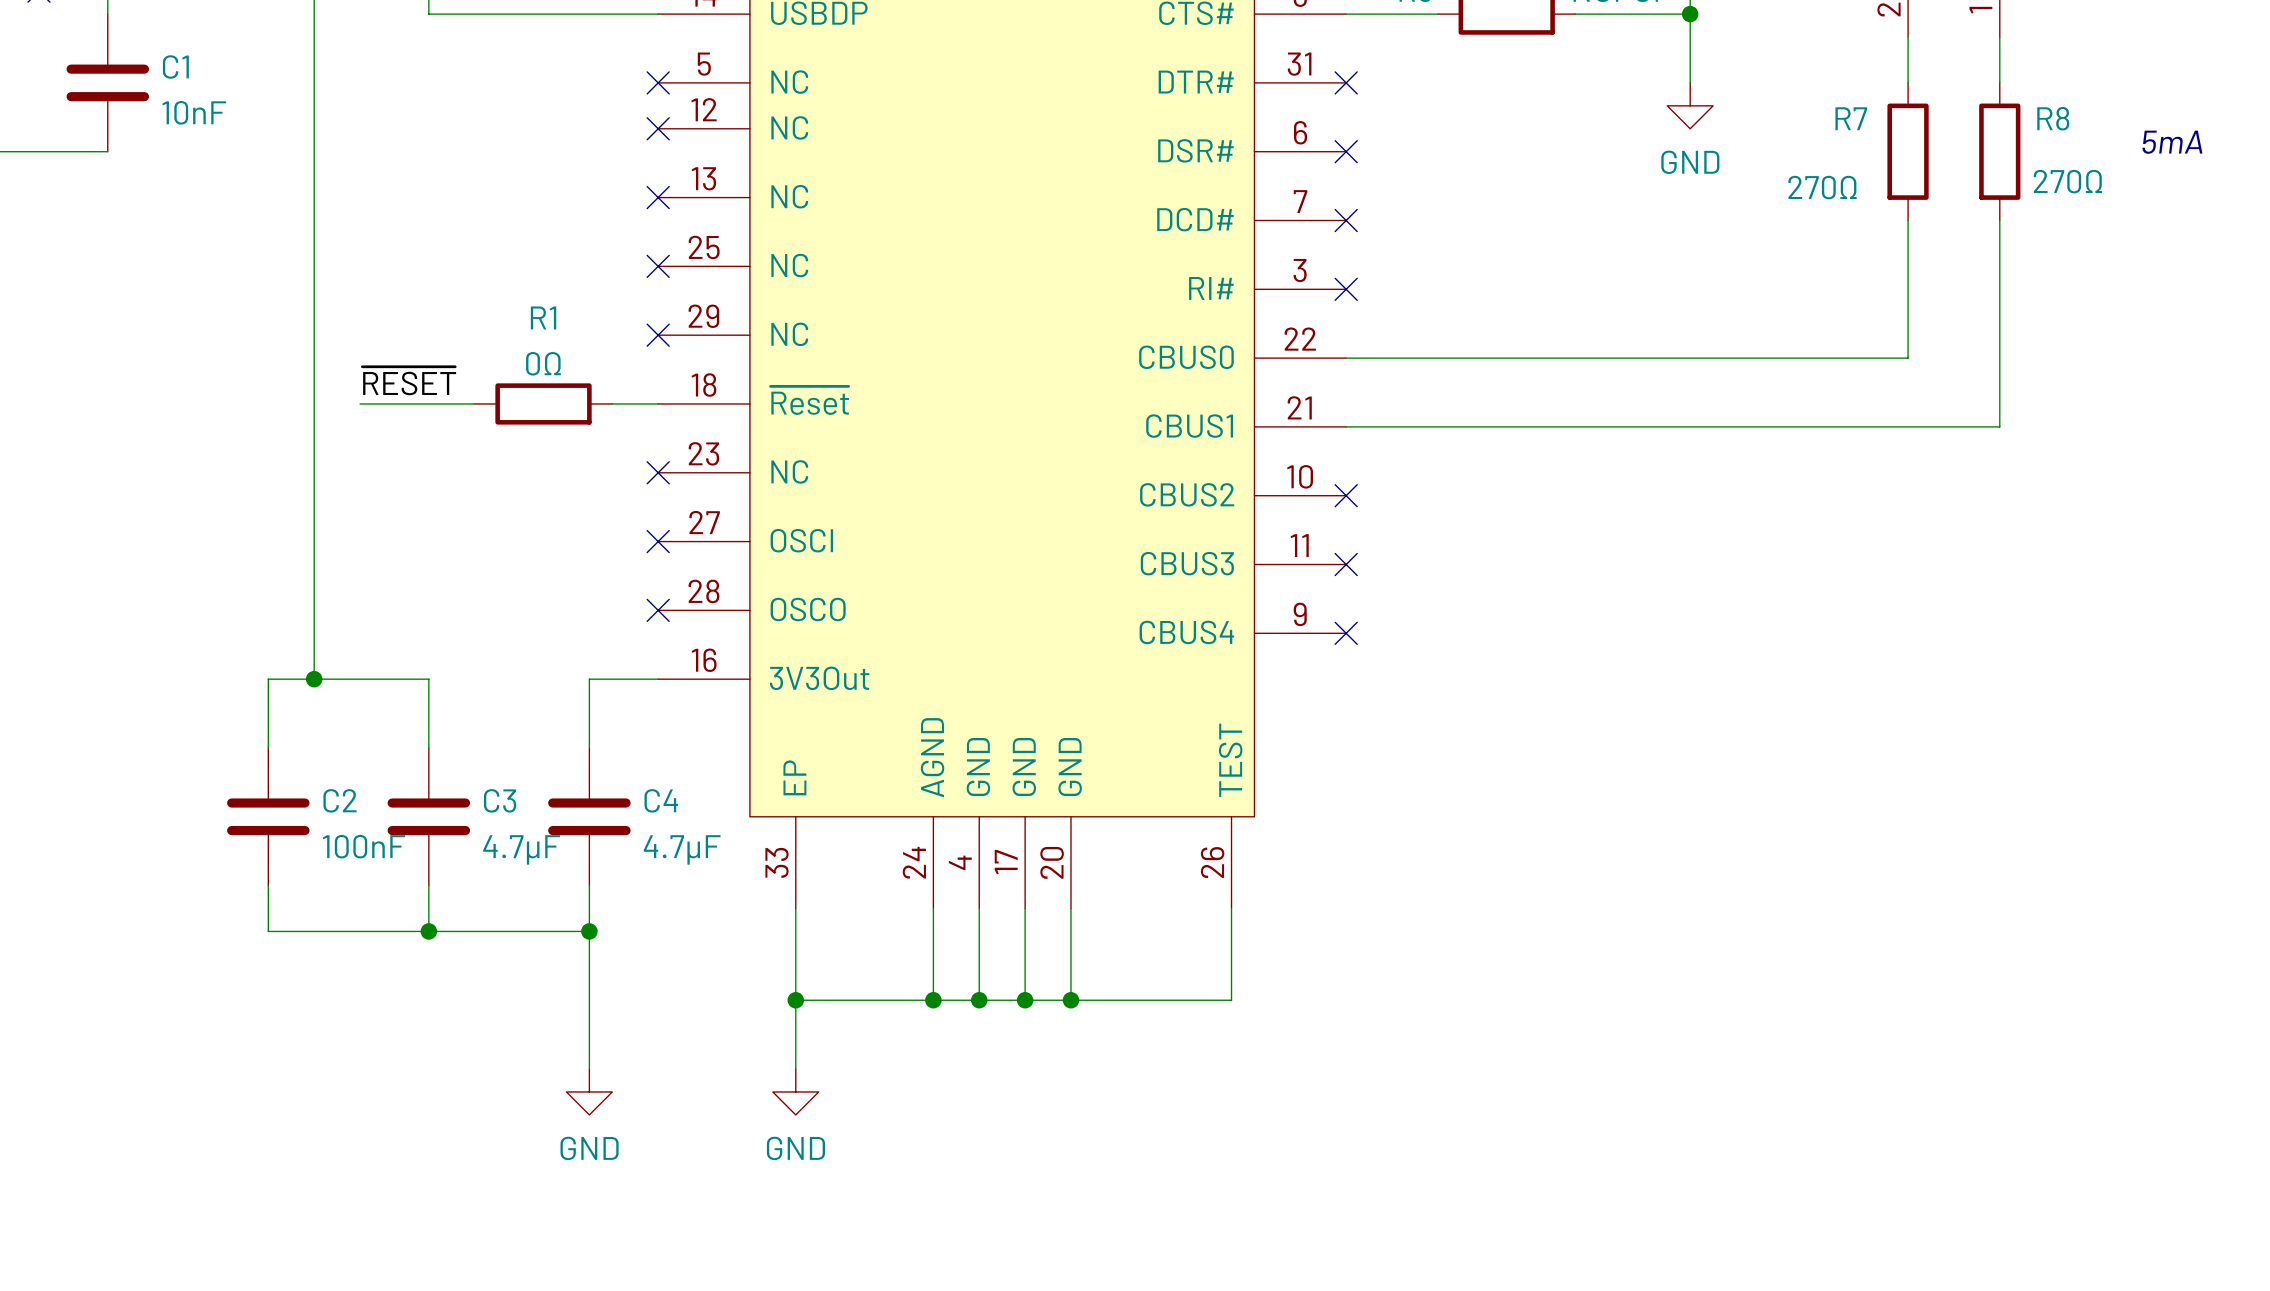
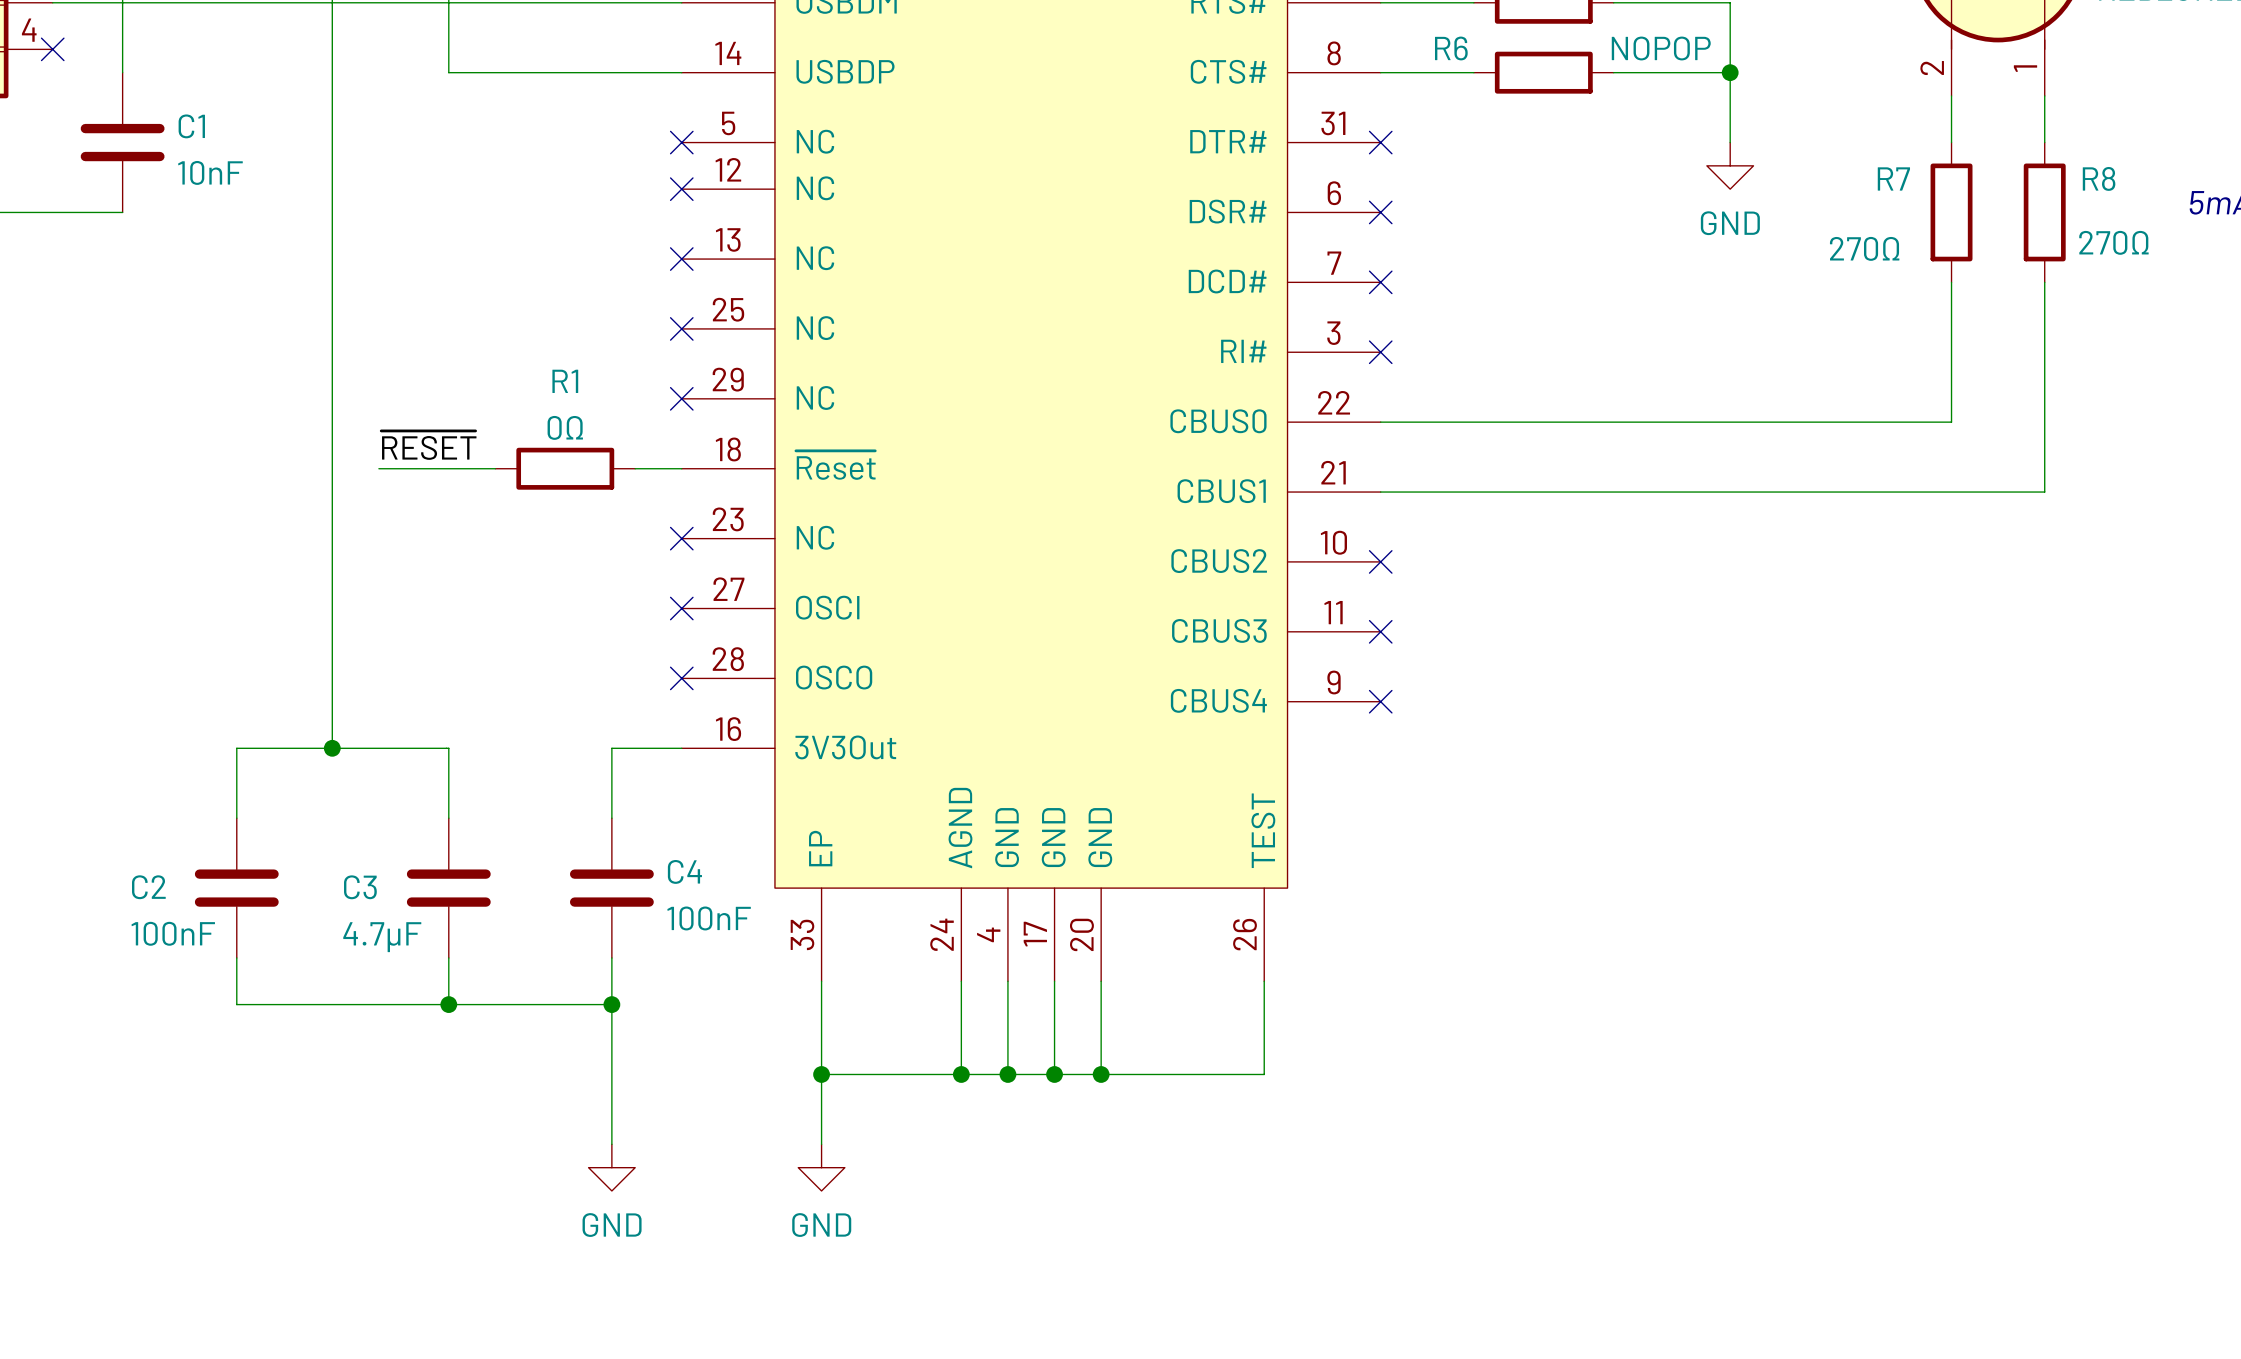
wire: (268, 679) (268, 747) -> (285, 748) (236, 748) (236, 818)
C2 name position: C2 (340, 800) -> C2 (148, 887)
C3 name position: C3 (500, 800) -> C3 (360, 887)
C2 position: (268, 816) -> (236, 888)
C2 value position: 100nF (364, 846) -> 100nF (173, 933)
C3 value position: 4.7μF (521, 849) -> 4.7μF (382, 937)
C4 value: 4.7μF (682, 849) -> 100nF (709, 918)
wire: (268, 885) (268, 931) -> (236, 957) (236, 1004) (285, 1004)

